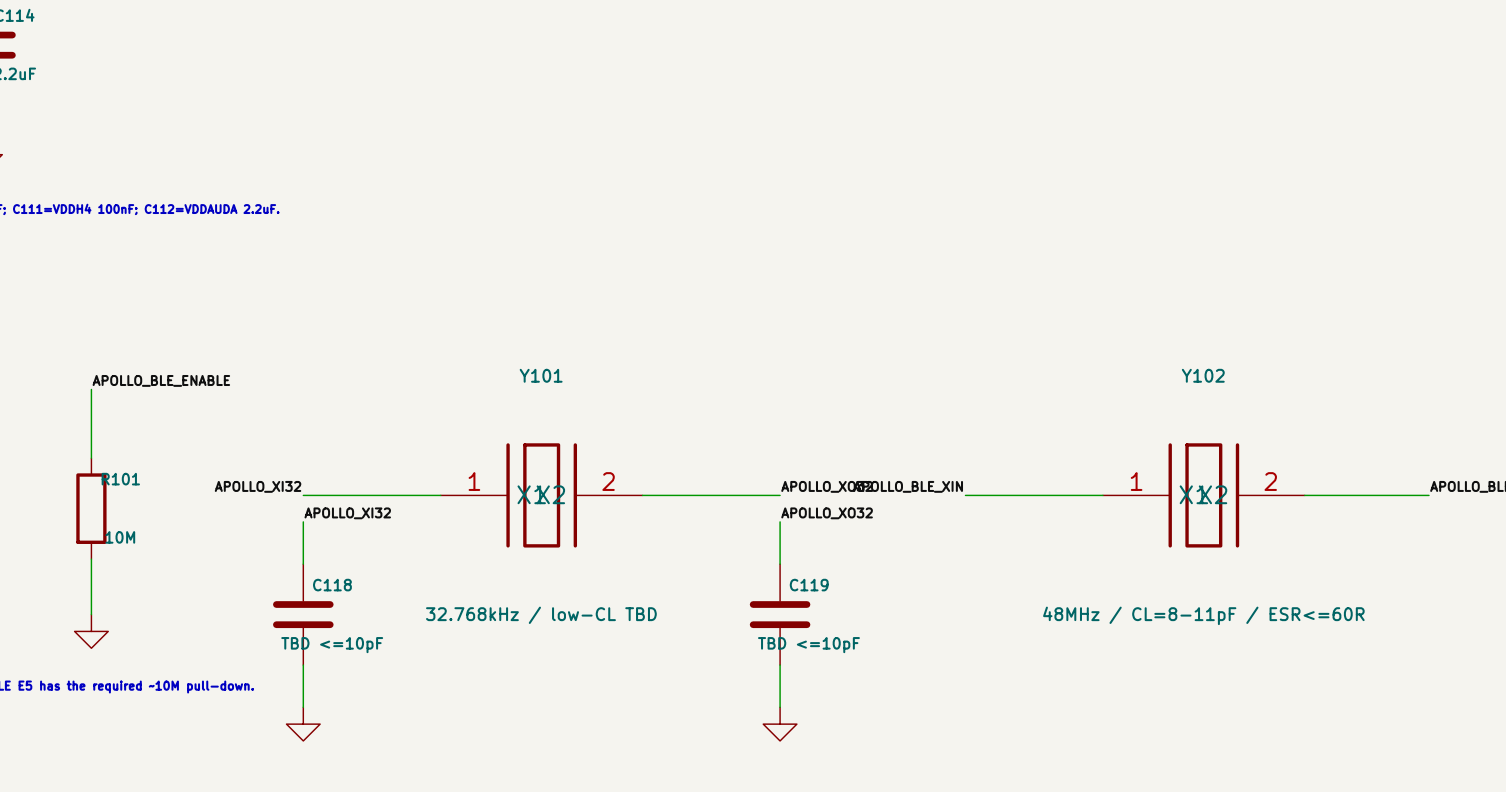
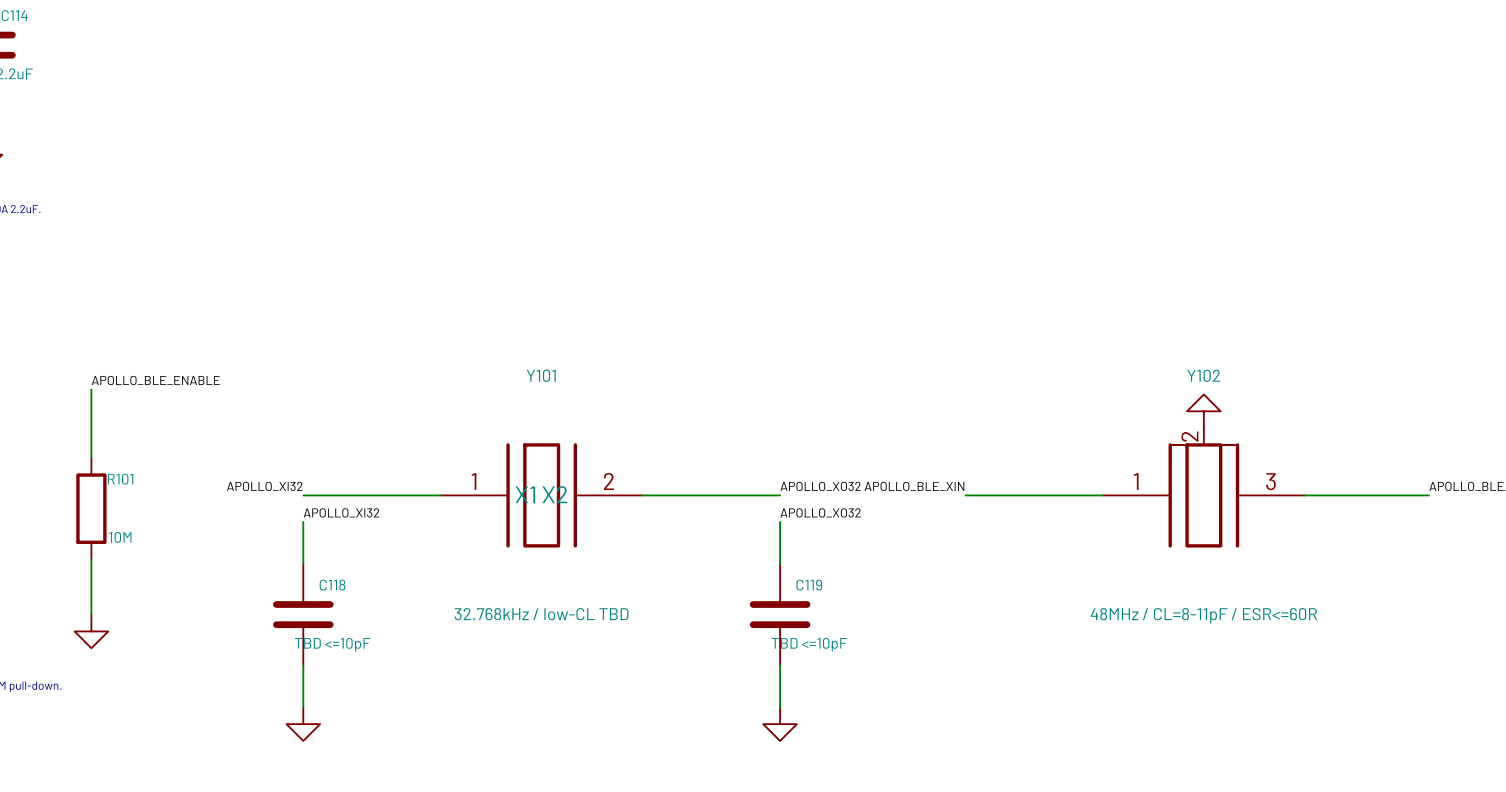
power symbol: none -> (1203, 411)
Y102 symbol: [1102, 443, 1305, 548] -> [1102, 428, 1305, 548]

